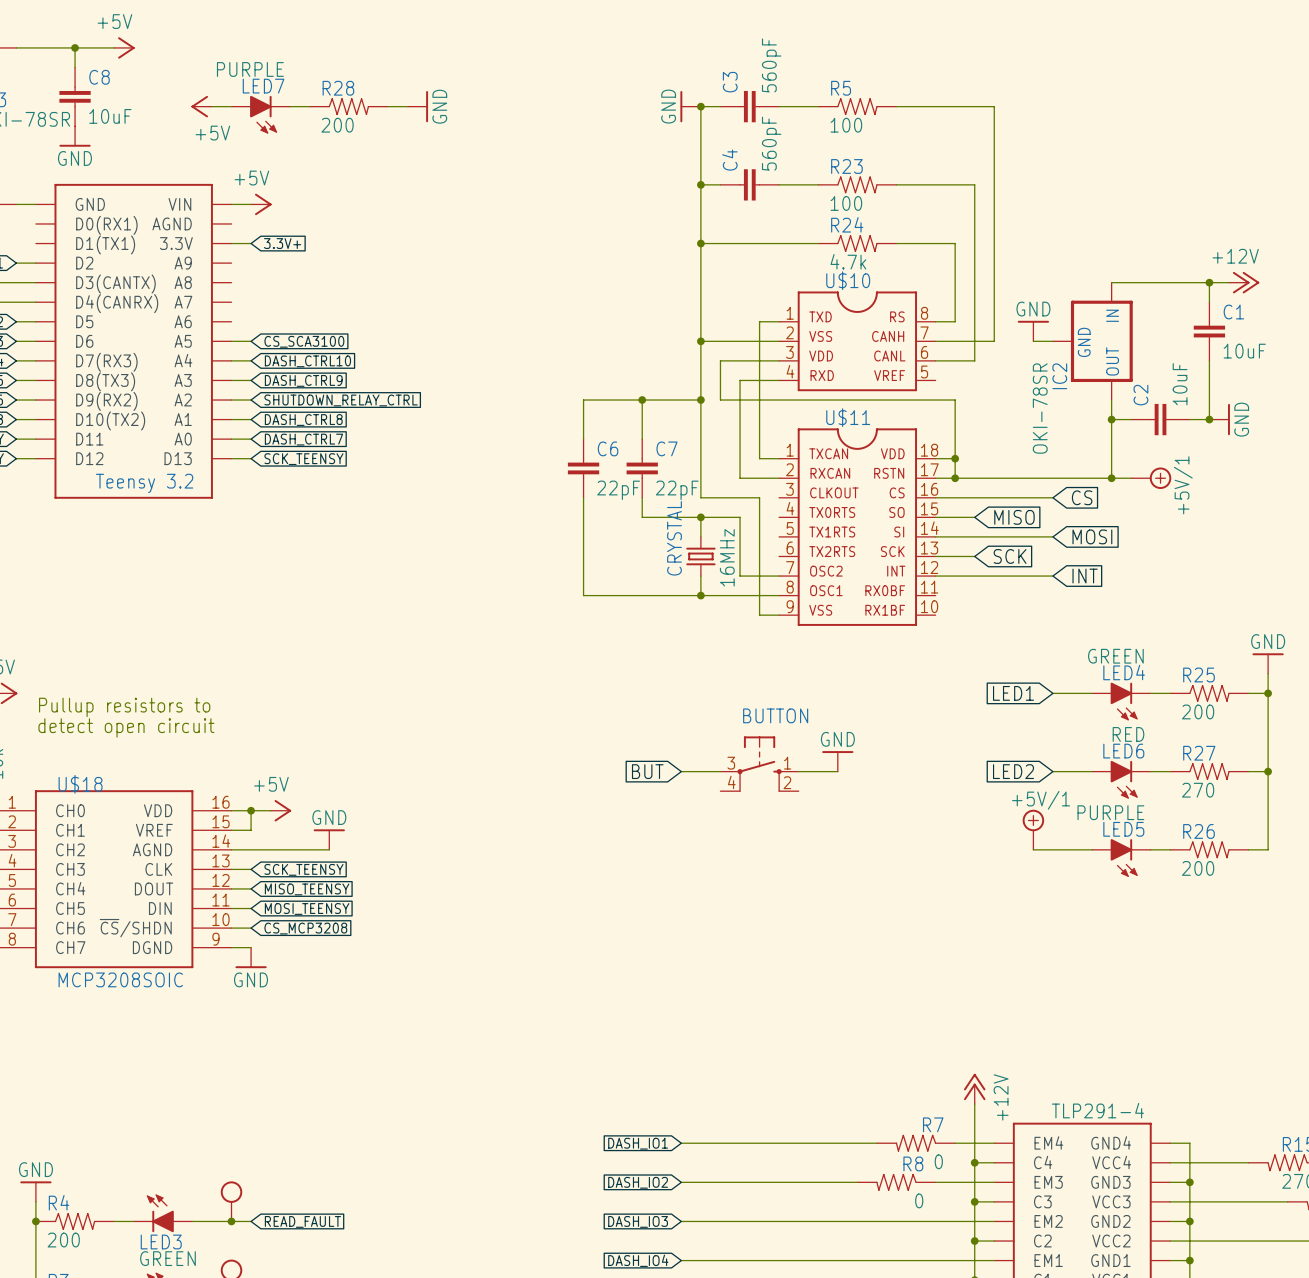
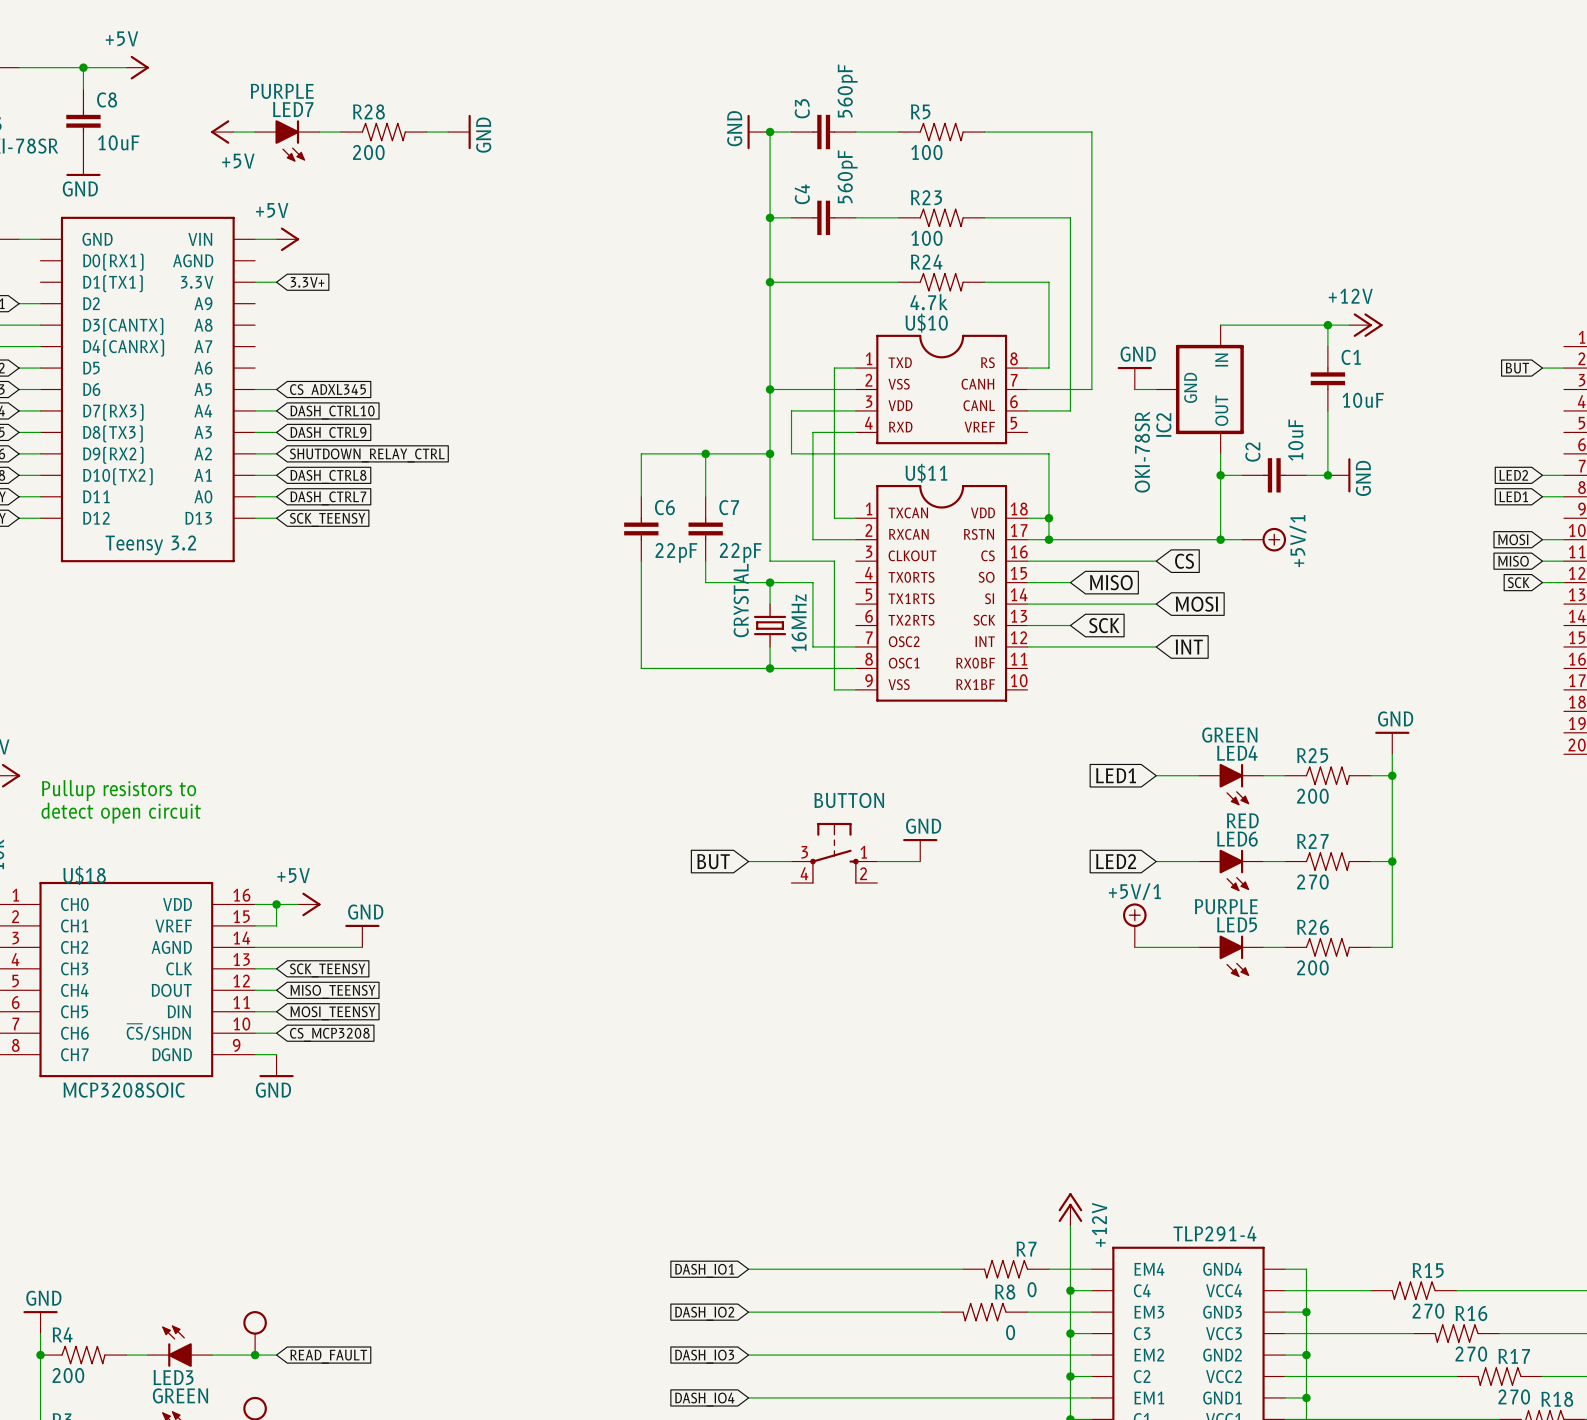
global label: CS_SCA3100 (304, 341) -> CS_ADXL345 (327, 391)

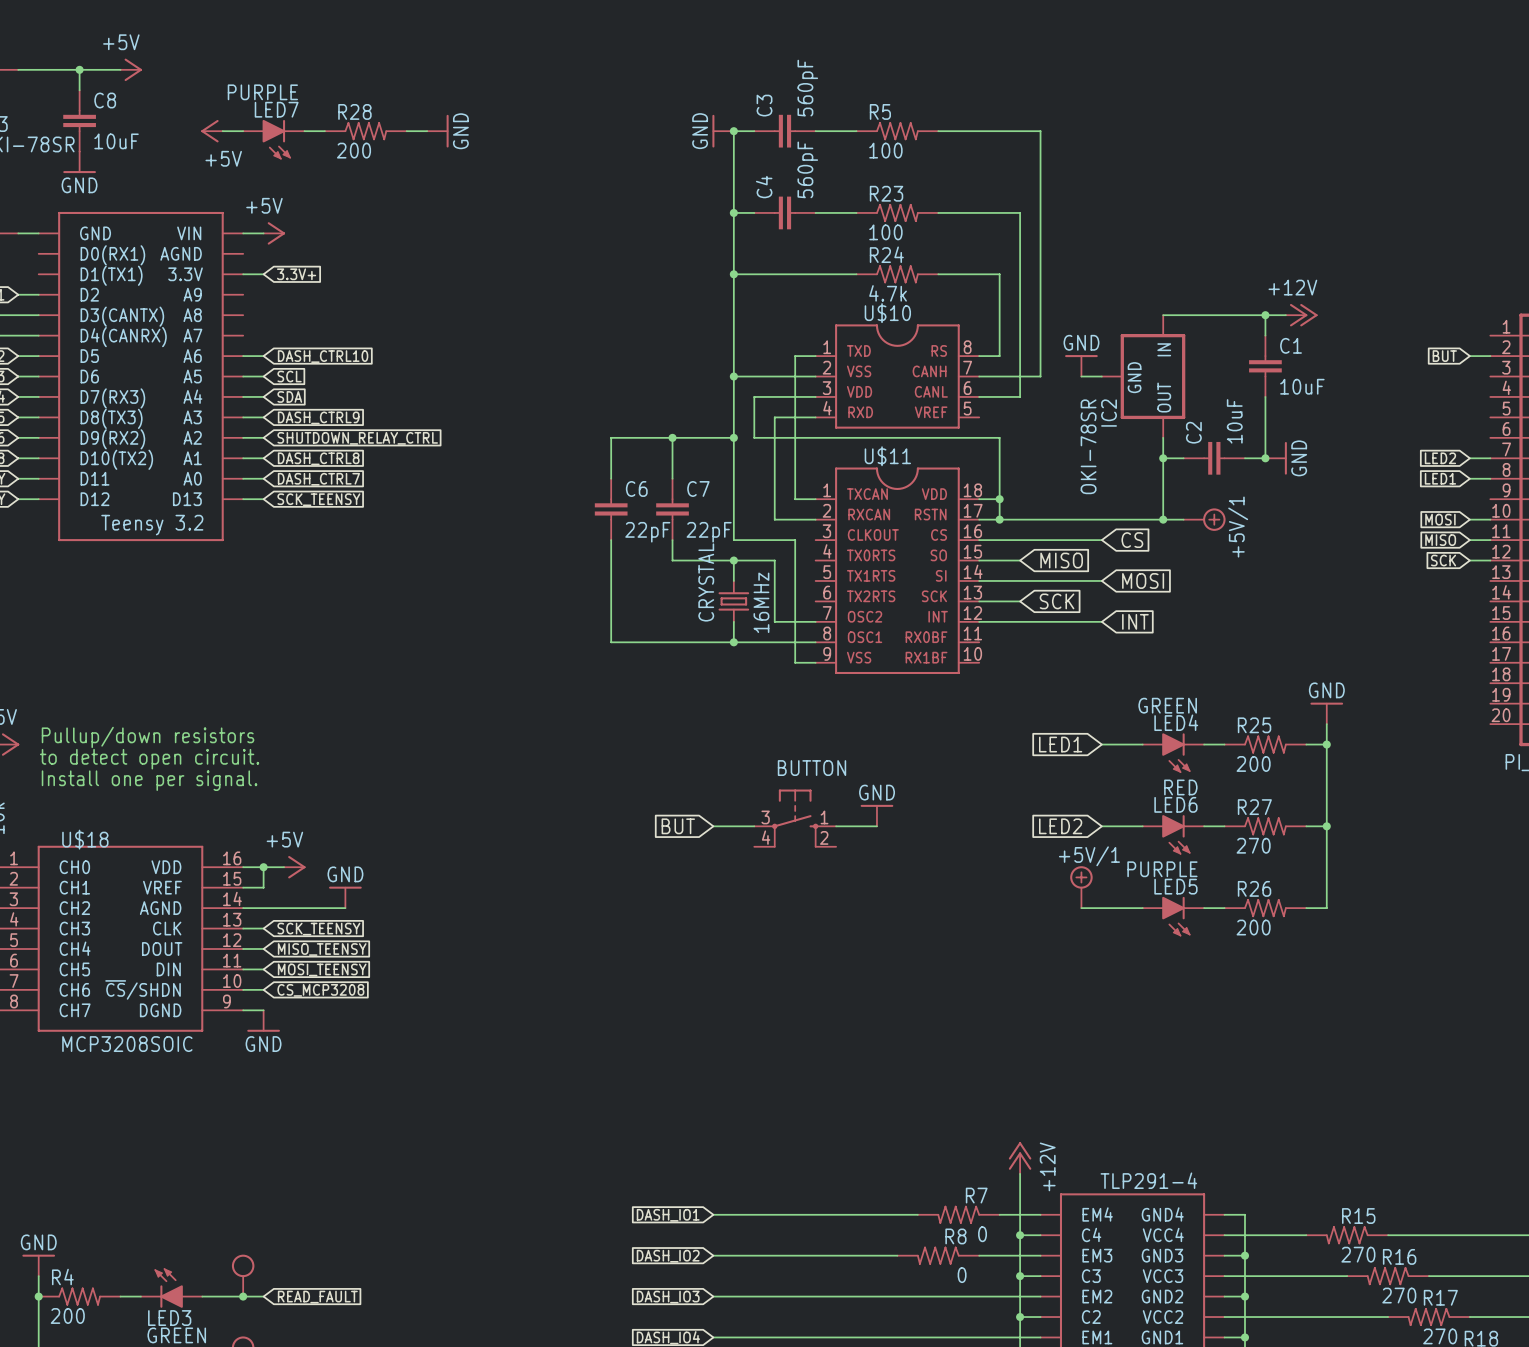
wire: none -> (243, 356) (263, 356)
global label: none -> DASH_CTRL10 (323, 356)
global label: CS_ADXL345 (327, 391) -> SCL (289, 376)
global label: DASH_CTRL10 (332, 412) -> SDA (289, 396)
text: none -> Pullup/down resistors (148, 737)
text: Pullup resistors to (119, 790) -> to detect open circuit. (149, 759)
text: detect open circuit (121, 813) -> Install one per signal. (149, 780)

